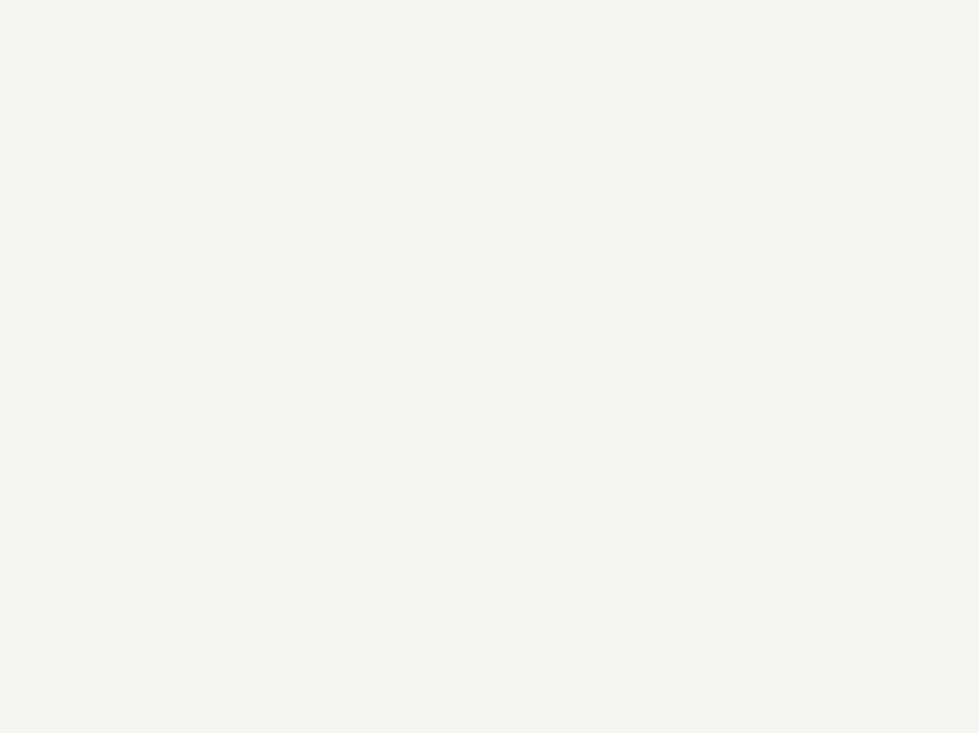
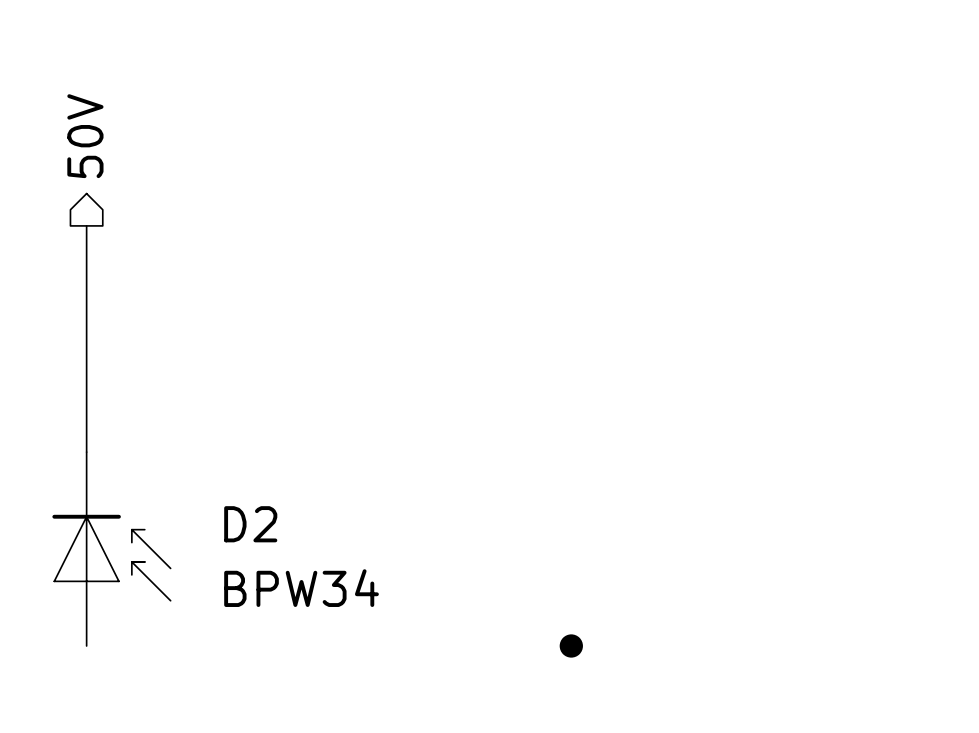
hierarchical label: none -> 50V (85, 136)
wire: none -> (86, 225) (86, 452)
D2: none -> BPW34 (111, 549)
junction: none -> (571, 645)

